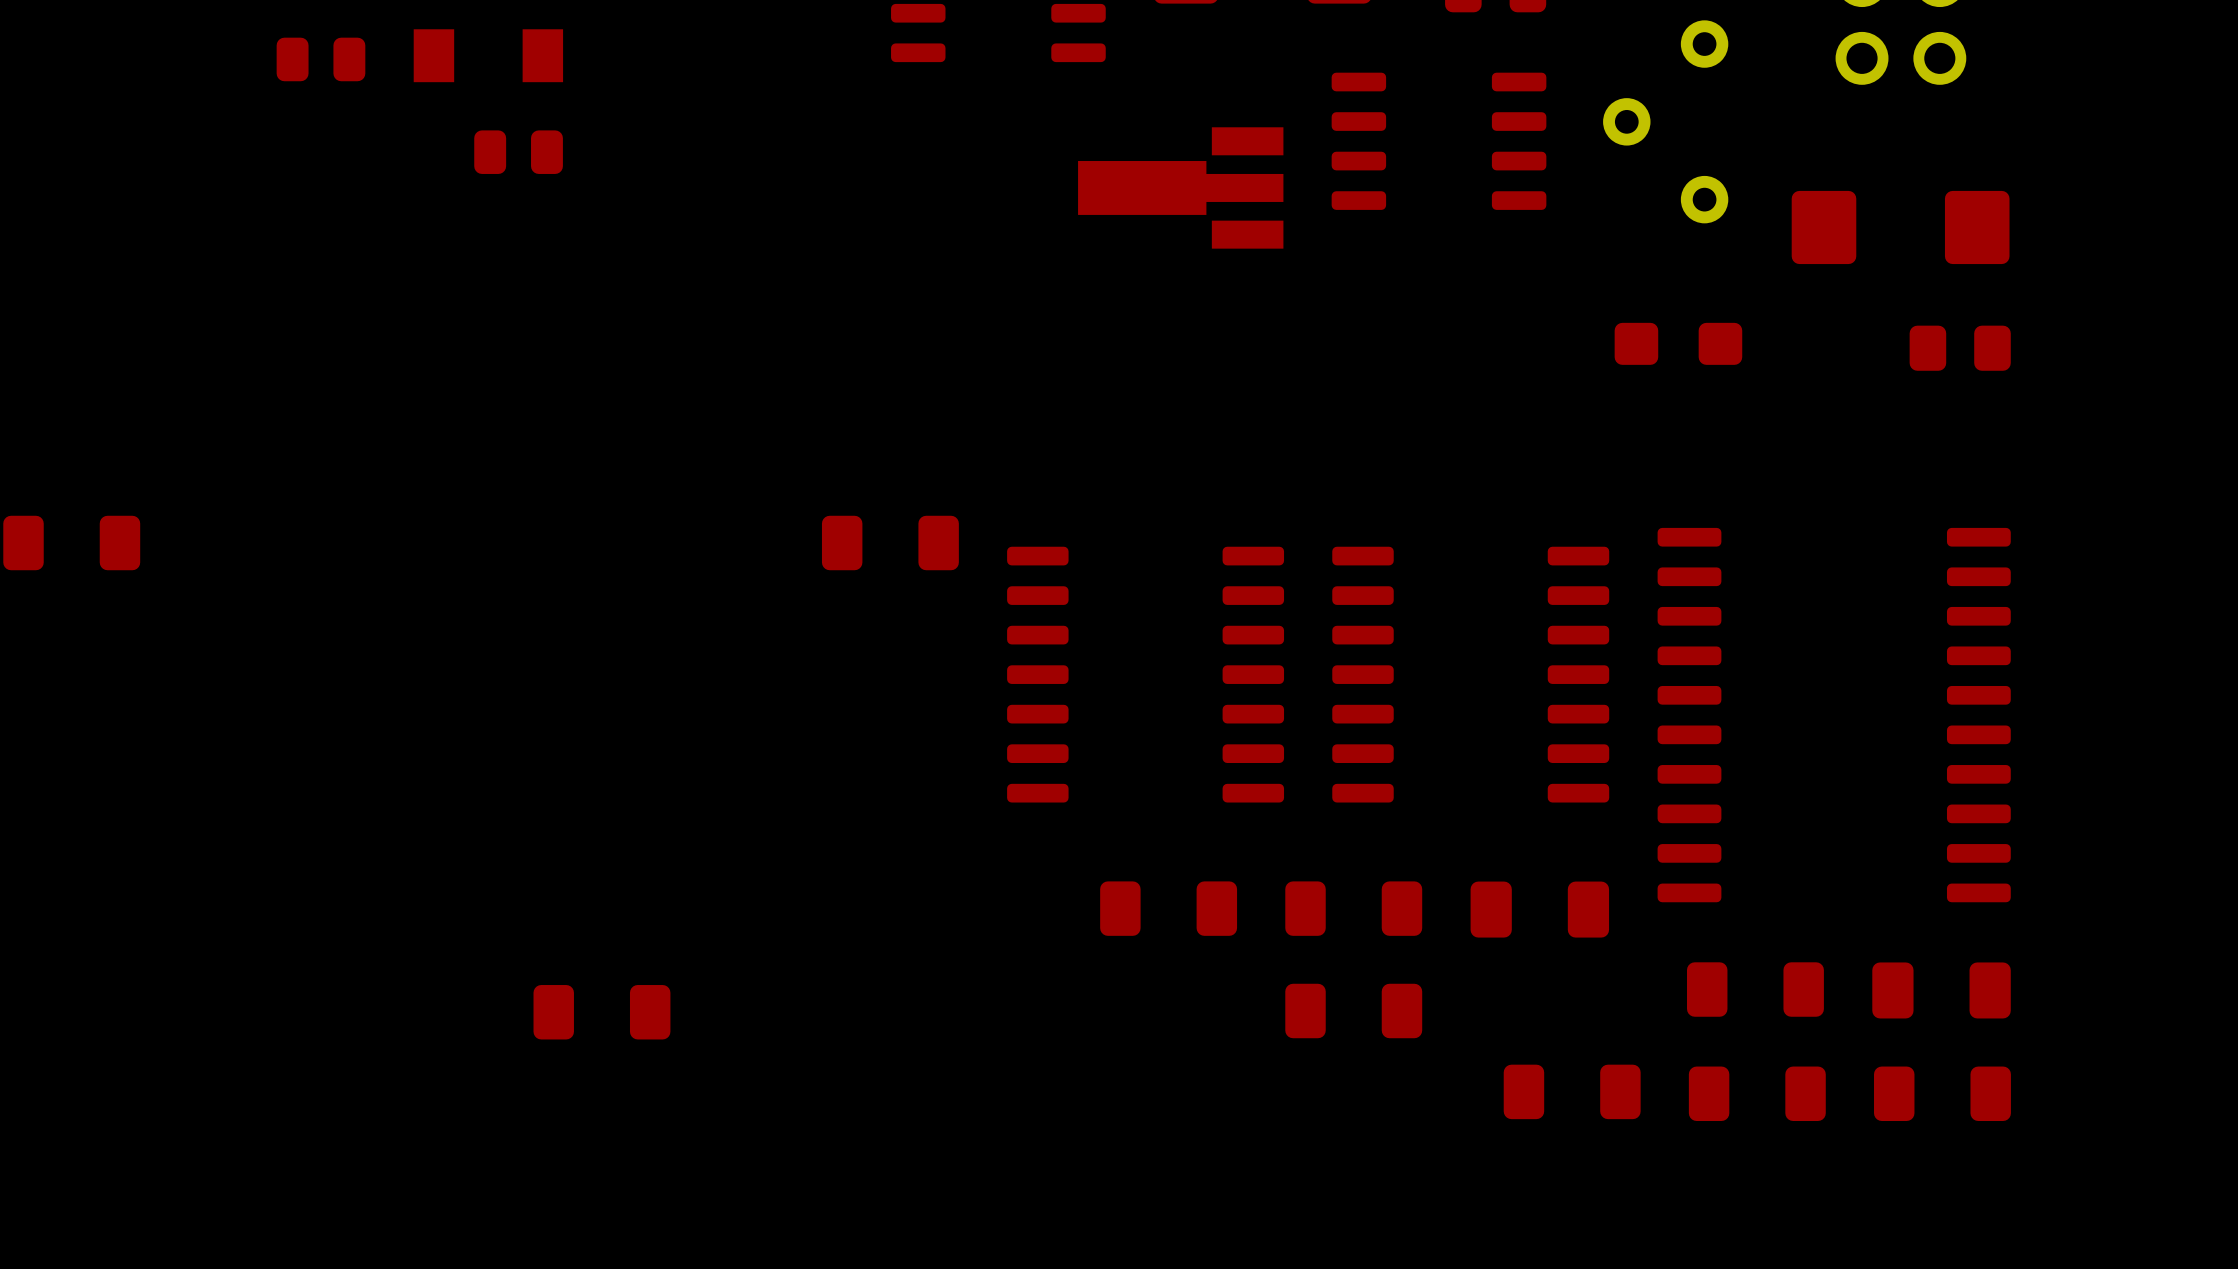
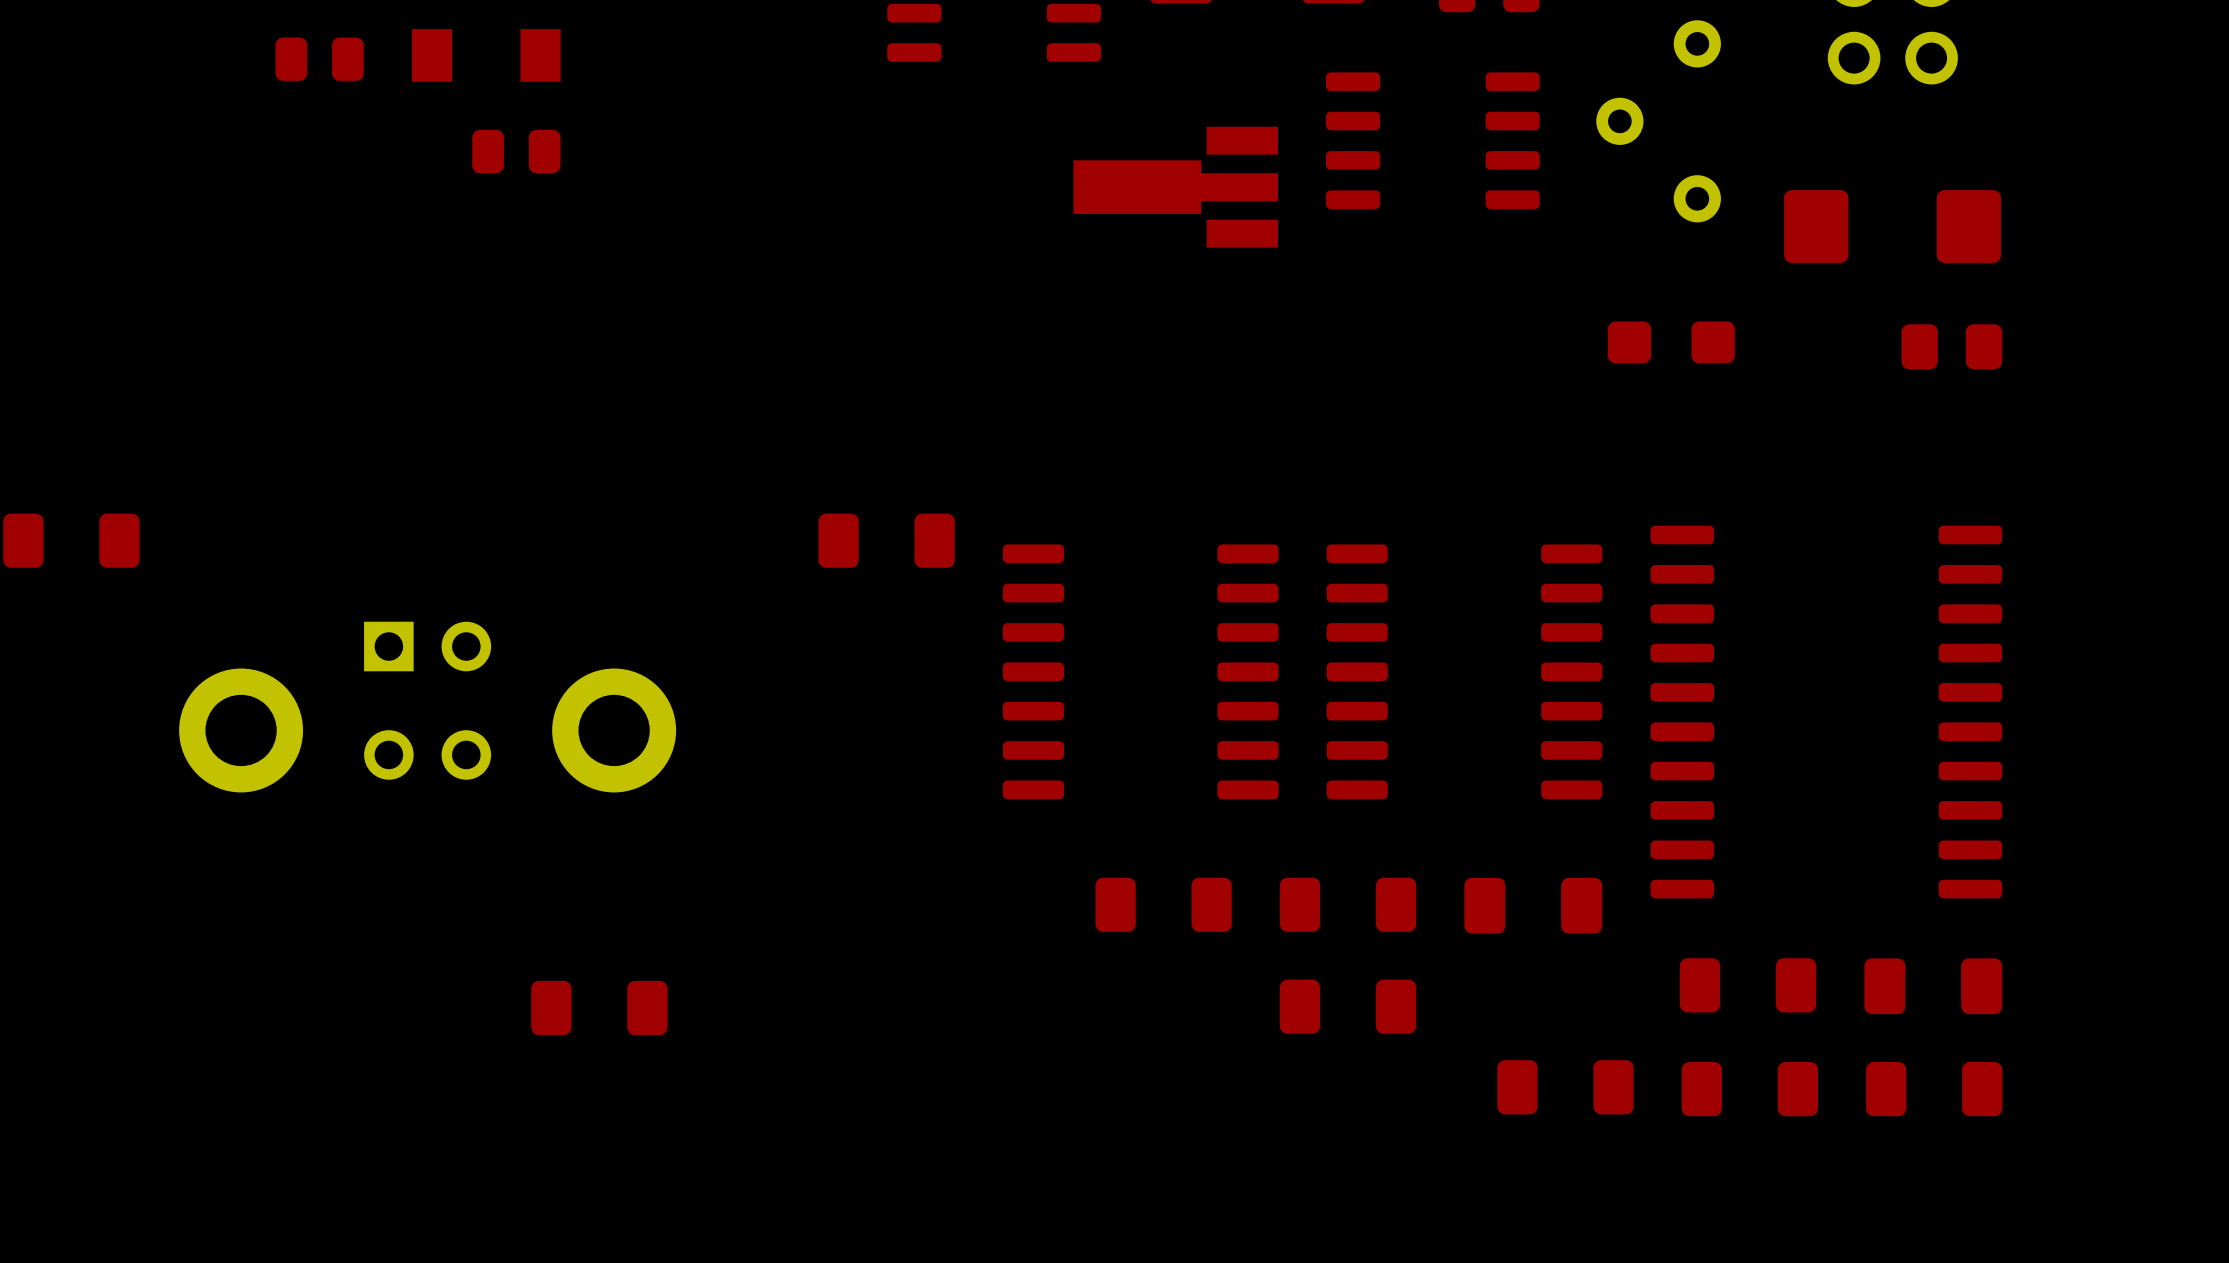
part: none -> (427, 707)

